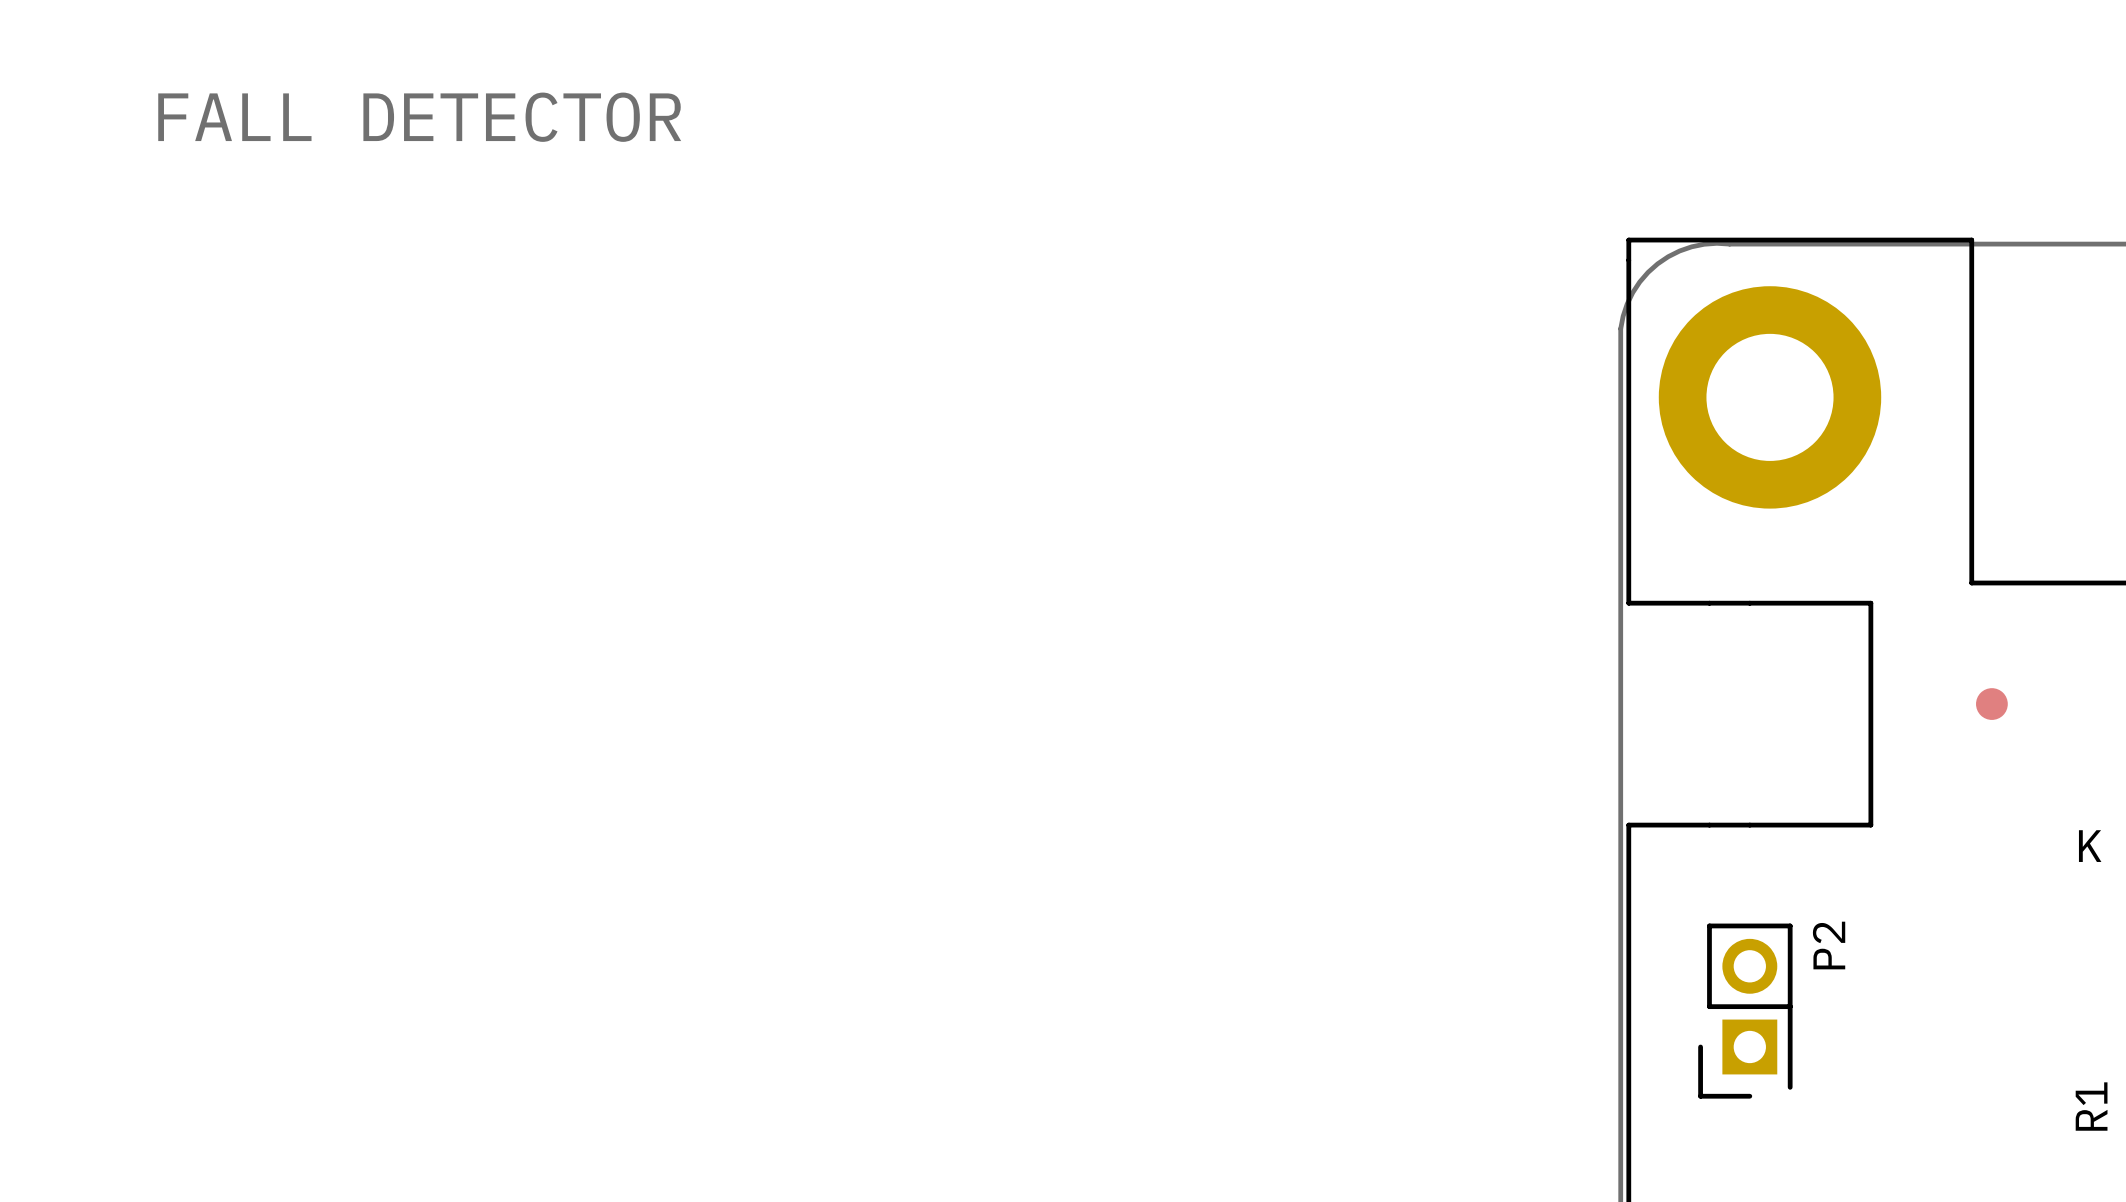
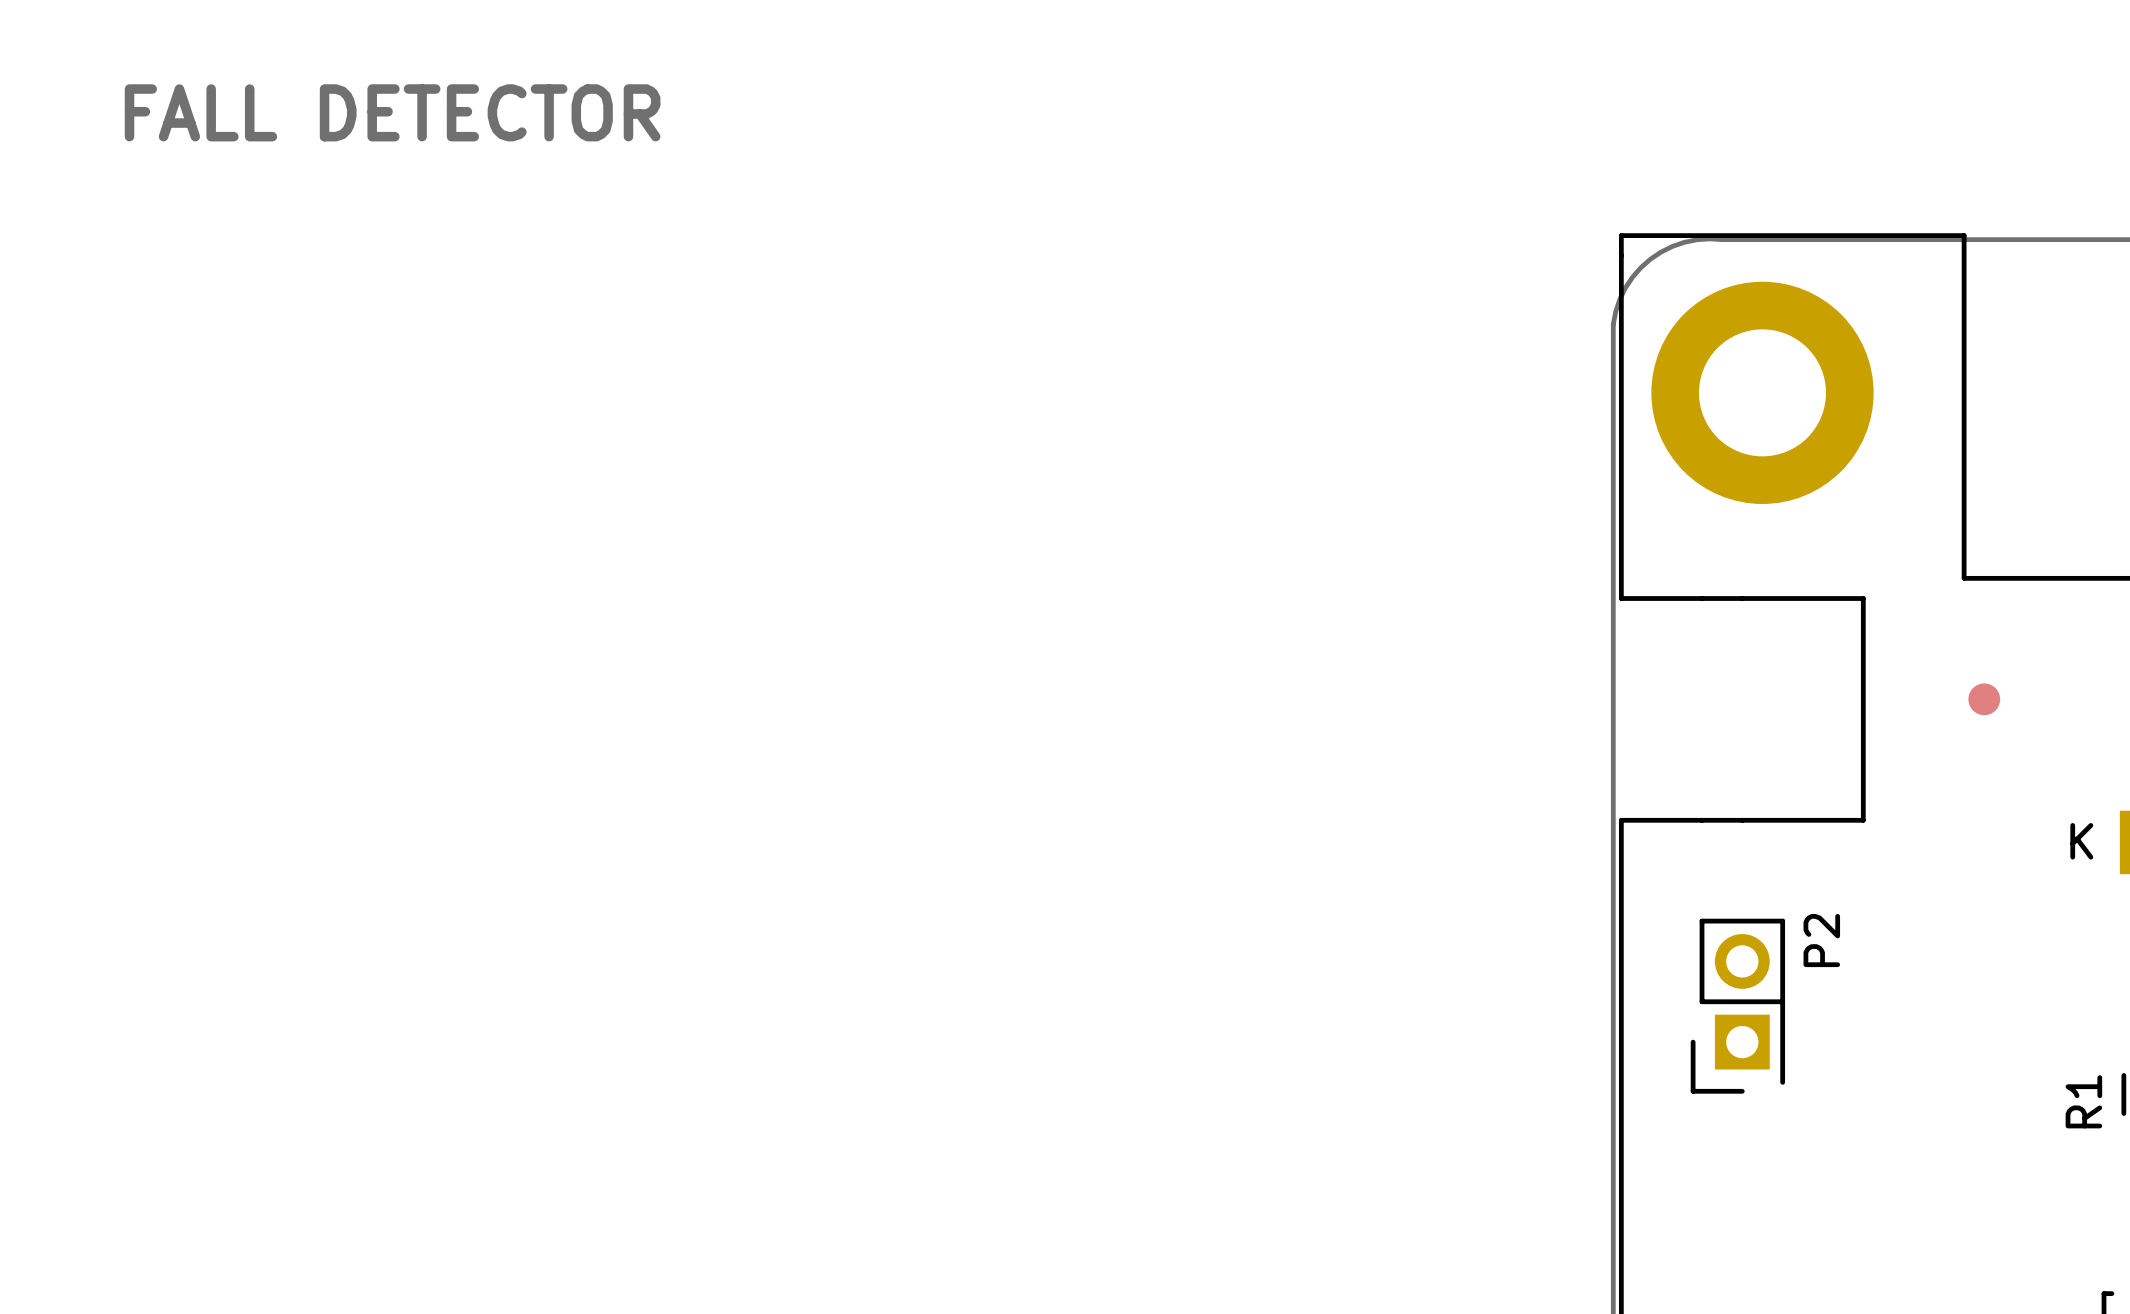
text position: FALL DETECTOR (419, 117) -> FALL DETECTOR (392, 112)

